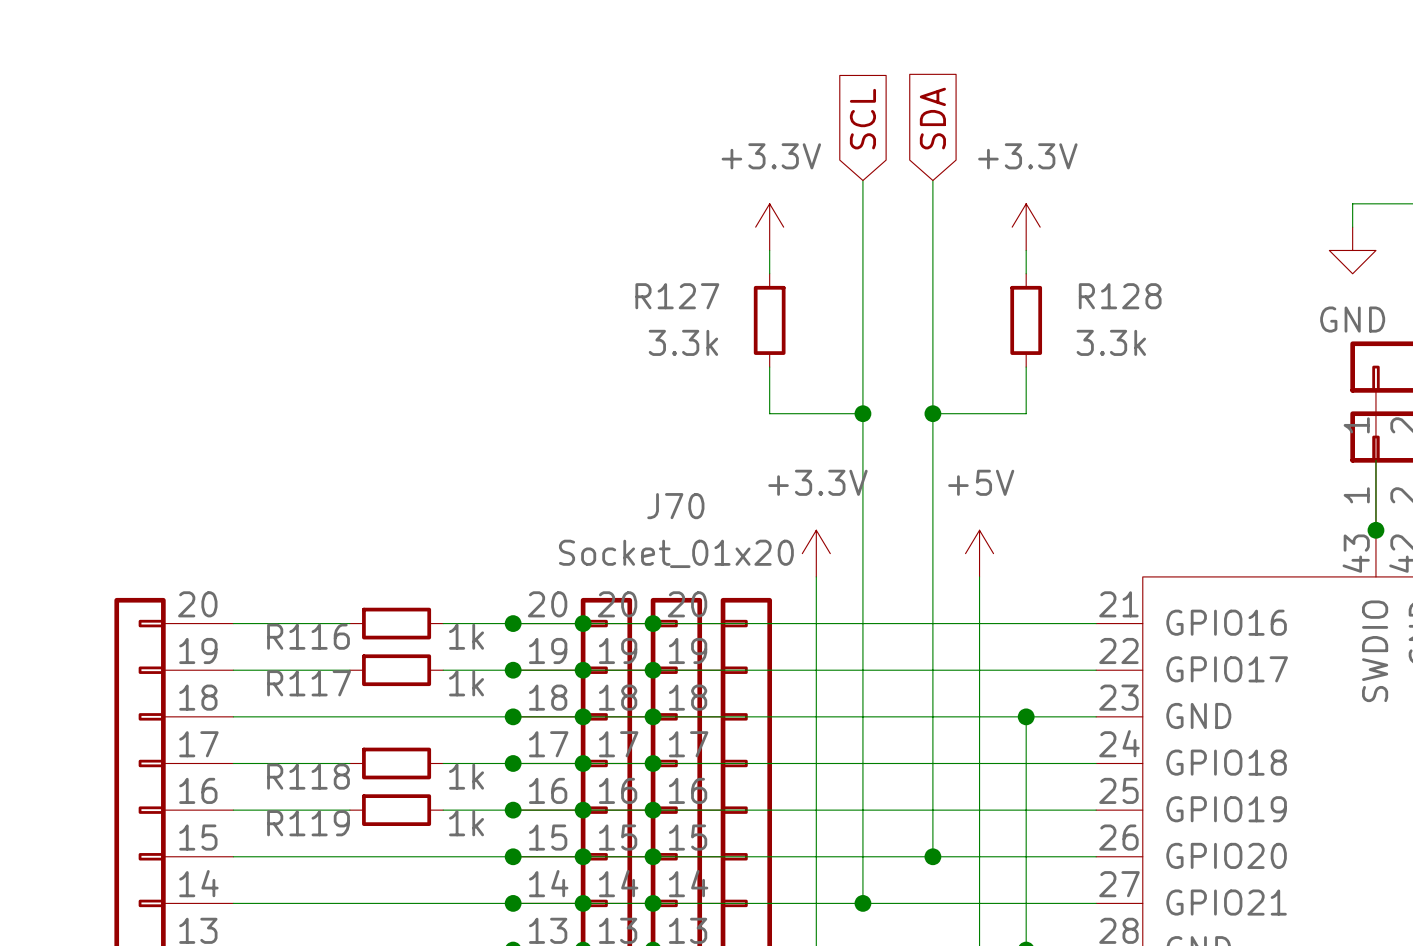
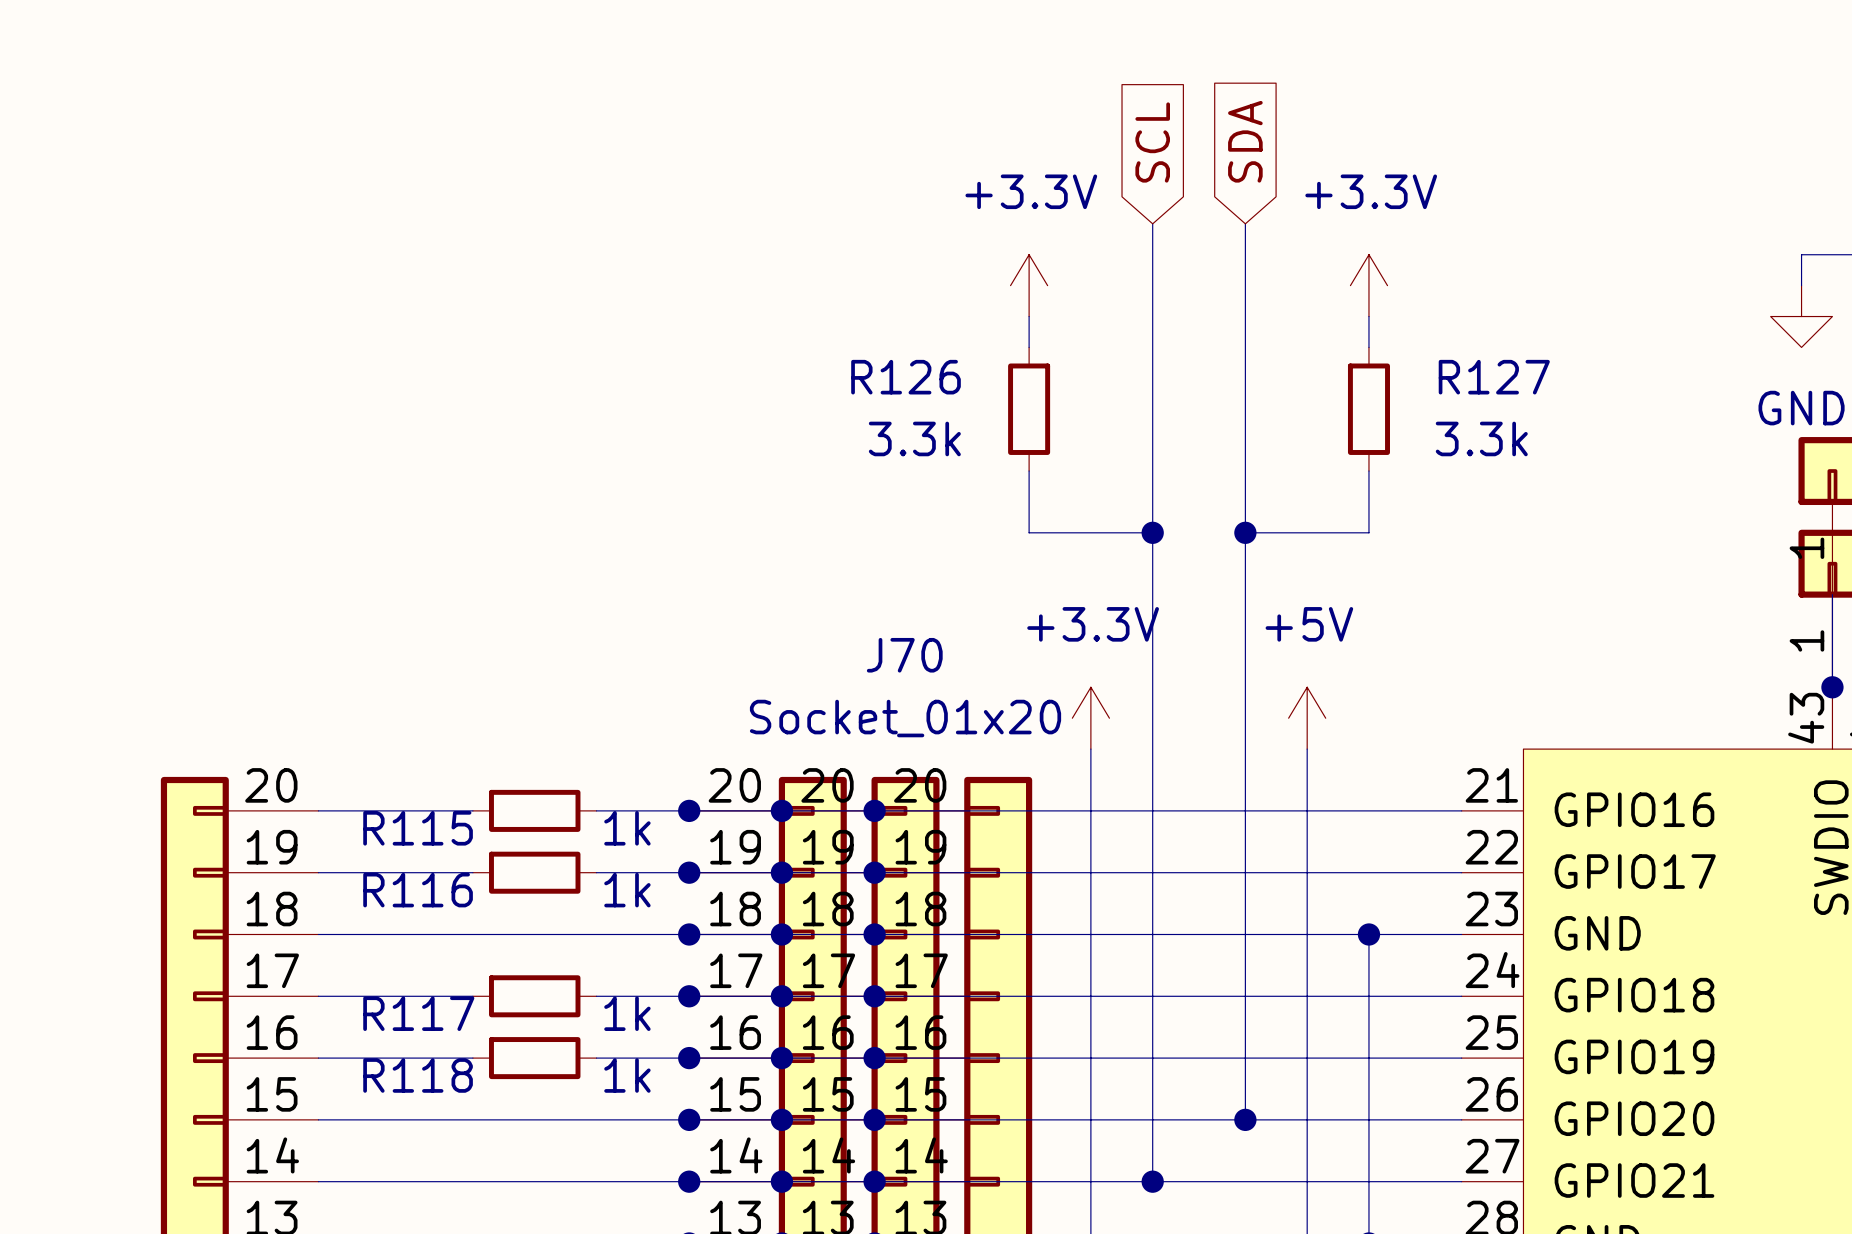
R127 name: R127 (677, 296) -> R126 (906, 377)
R128 name: R128 (1120, 296) -> R127 (1494, 377)
R116 name: R116 (308, 636) -> R115 (418, 828)
R117 name: R117 (309, 683) -> R116 (418, 890)
R118 name: R118 (308, 776) -> R117 (418, 1013)
R119 name: R119 (308, 823) -> R118 (418, 1075)

